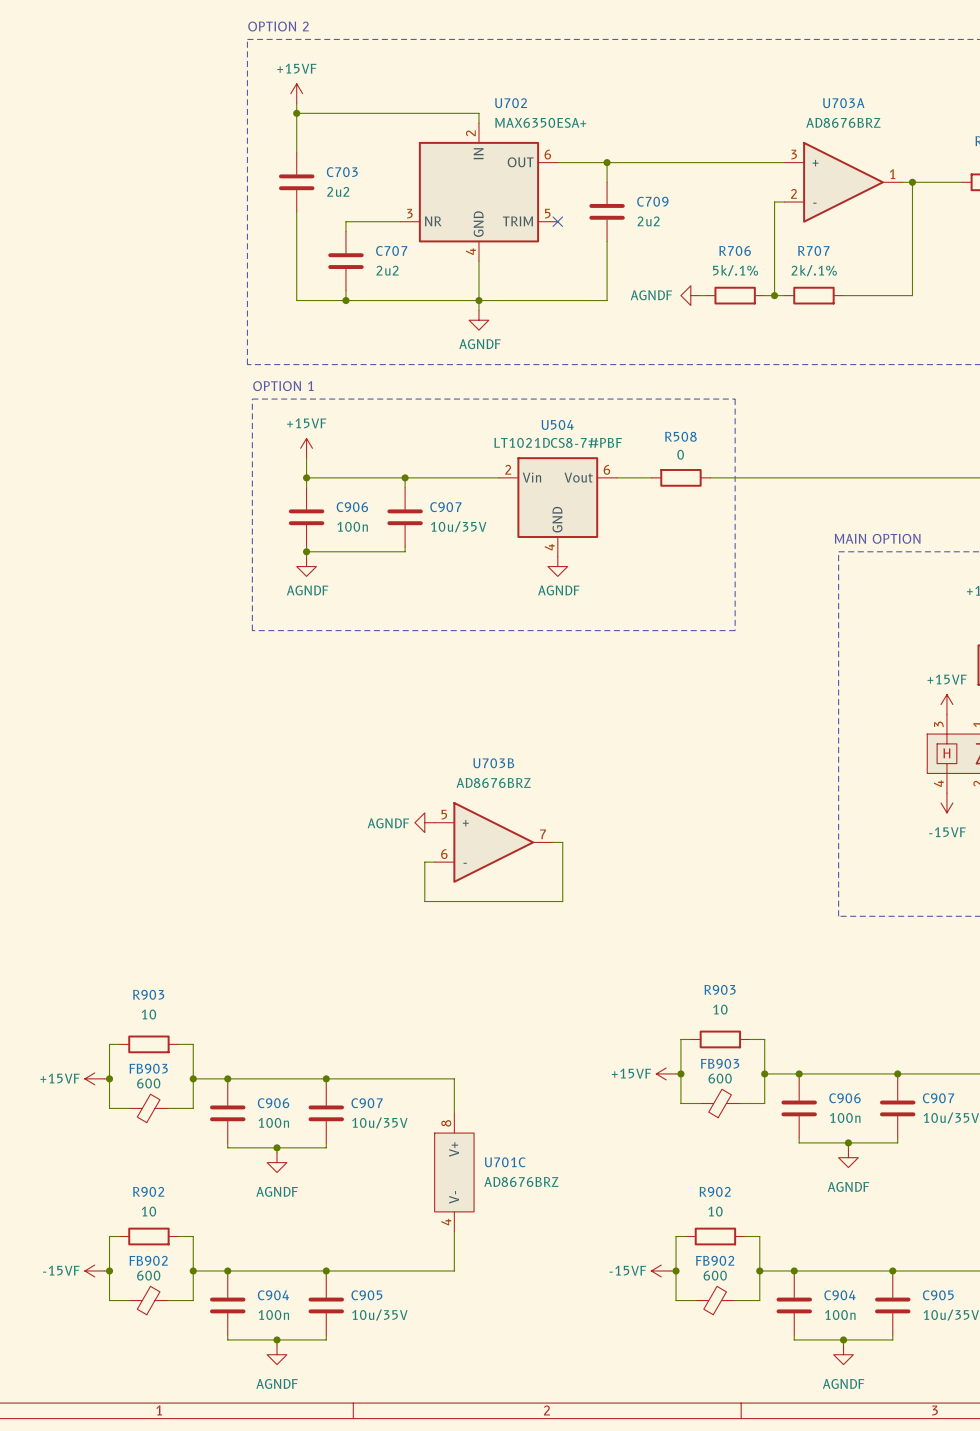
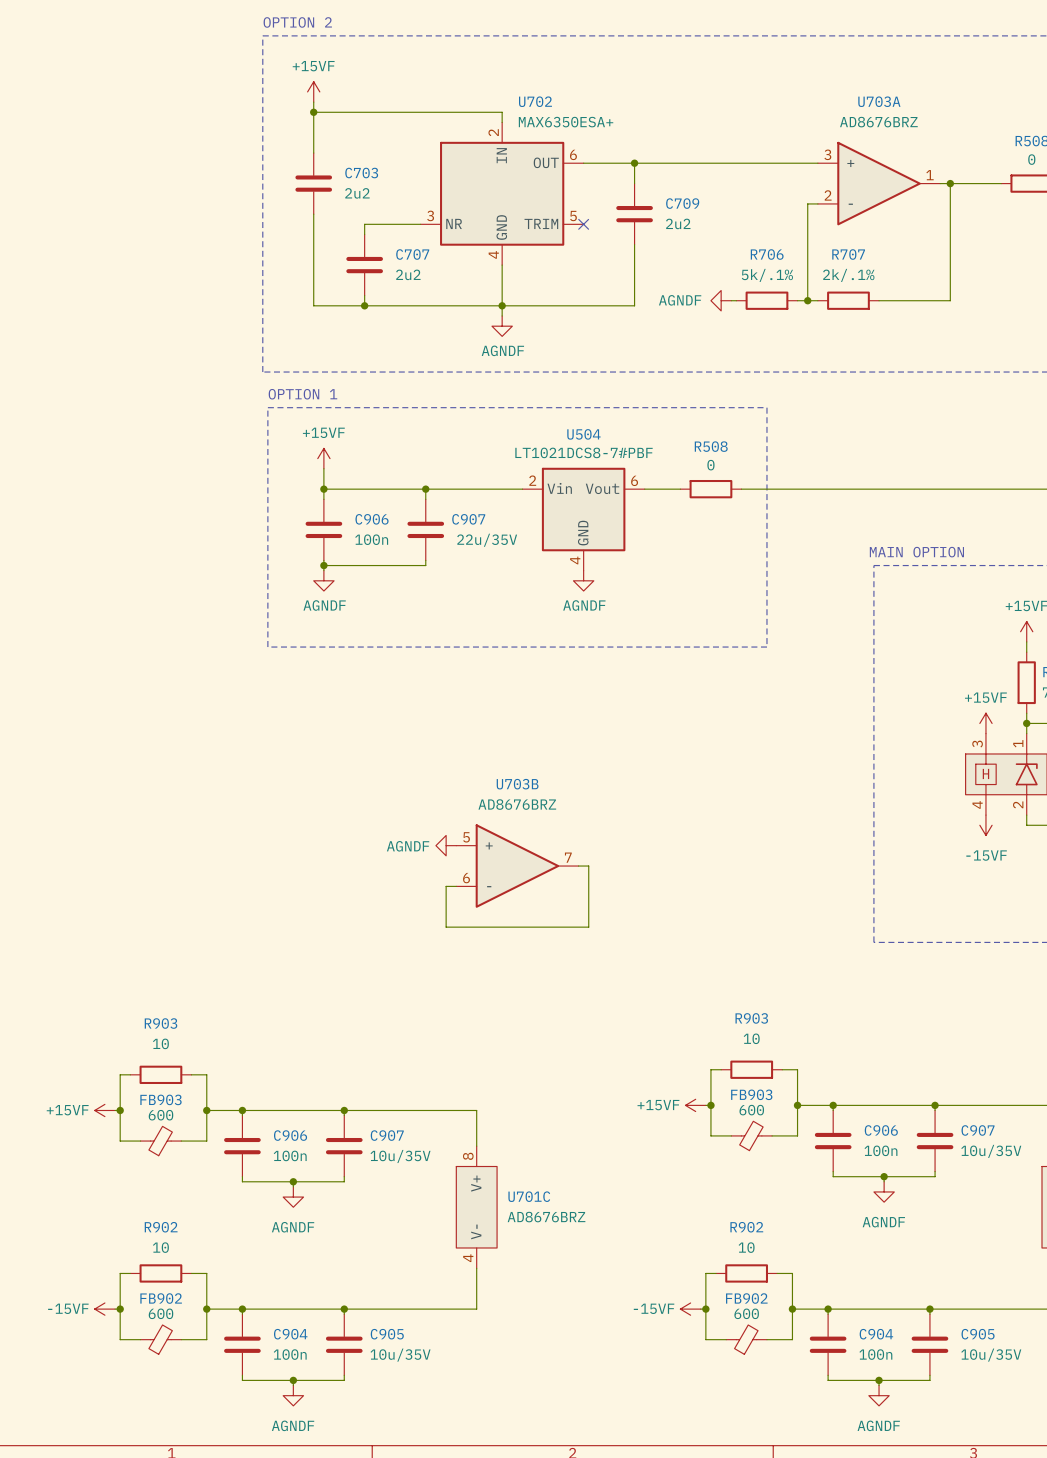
C907 value: 10u/35V (458, 526) -> 22u/35V (487, 540)

